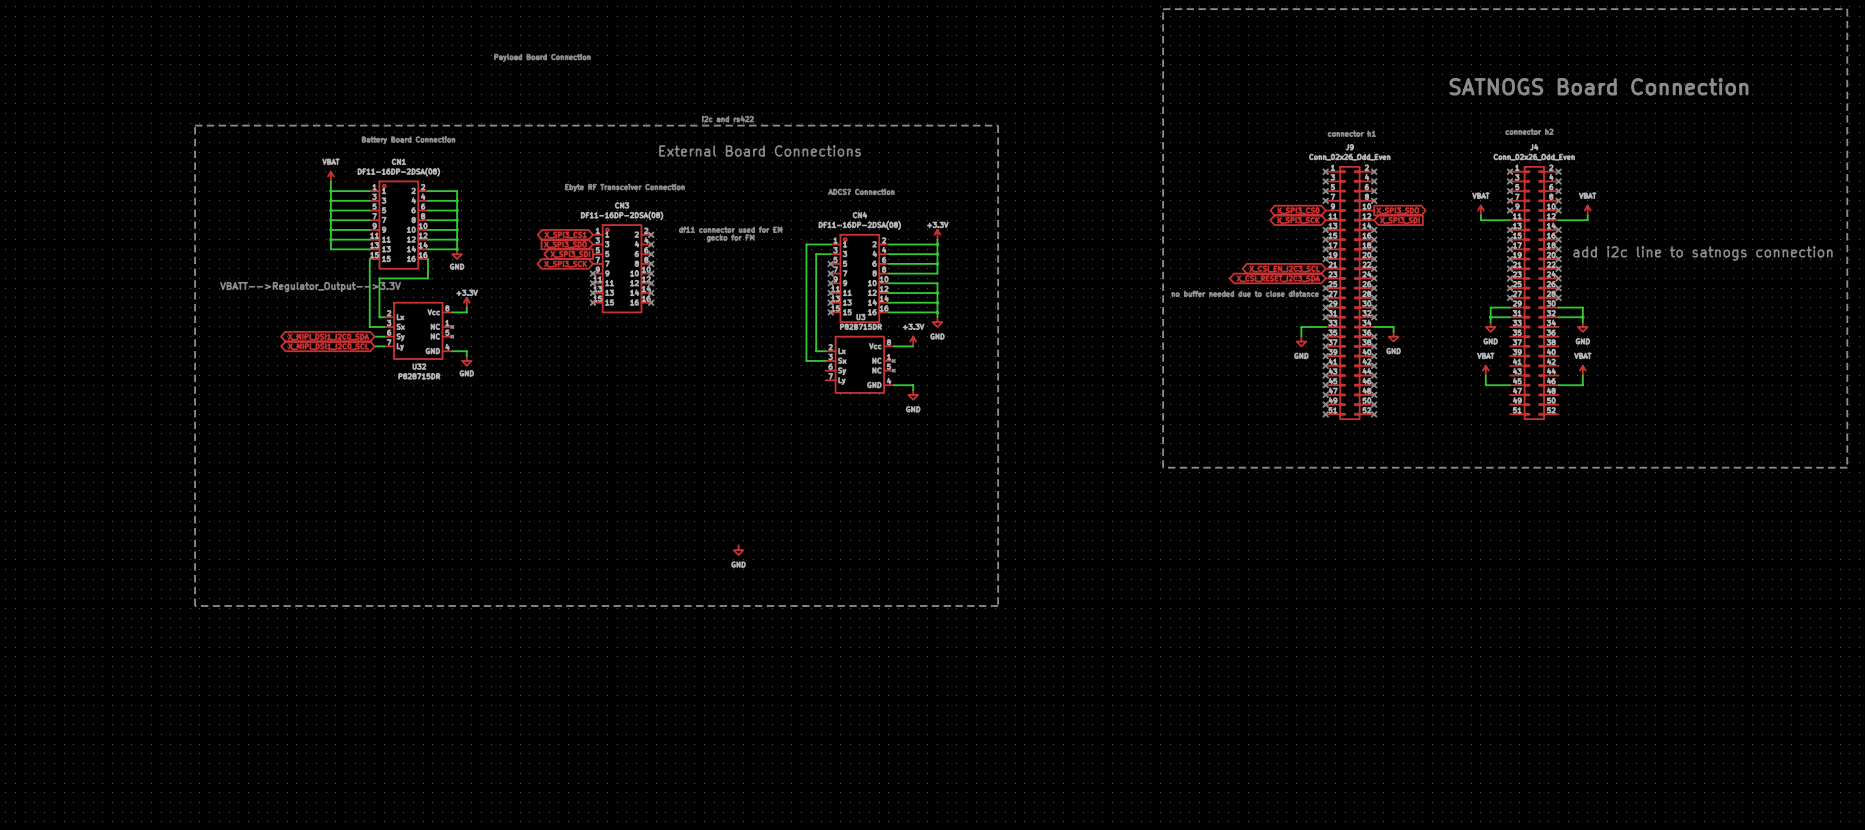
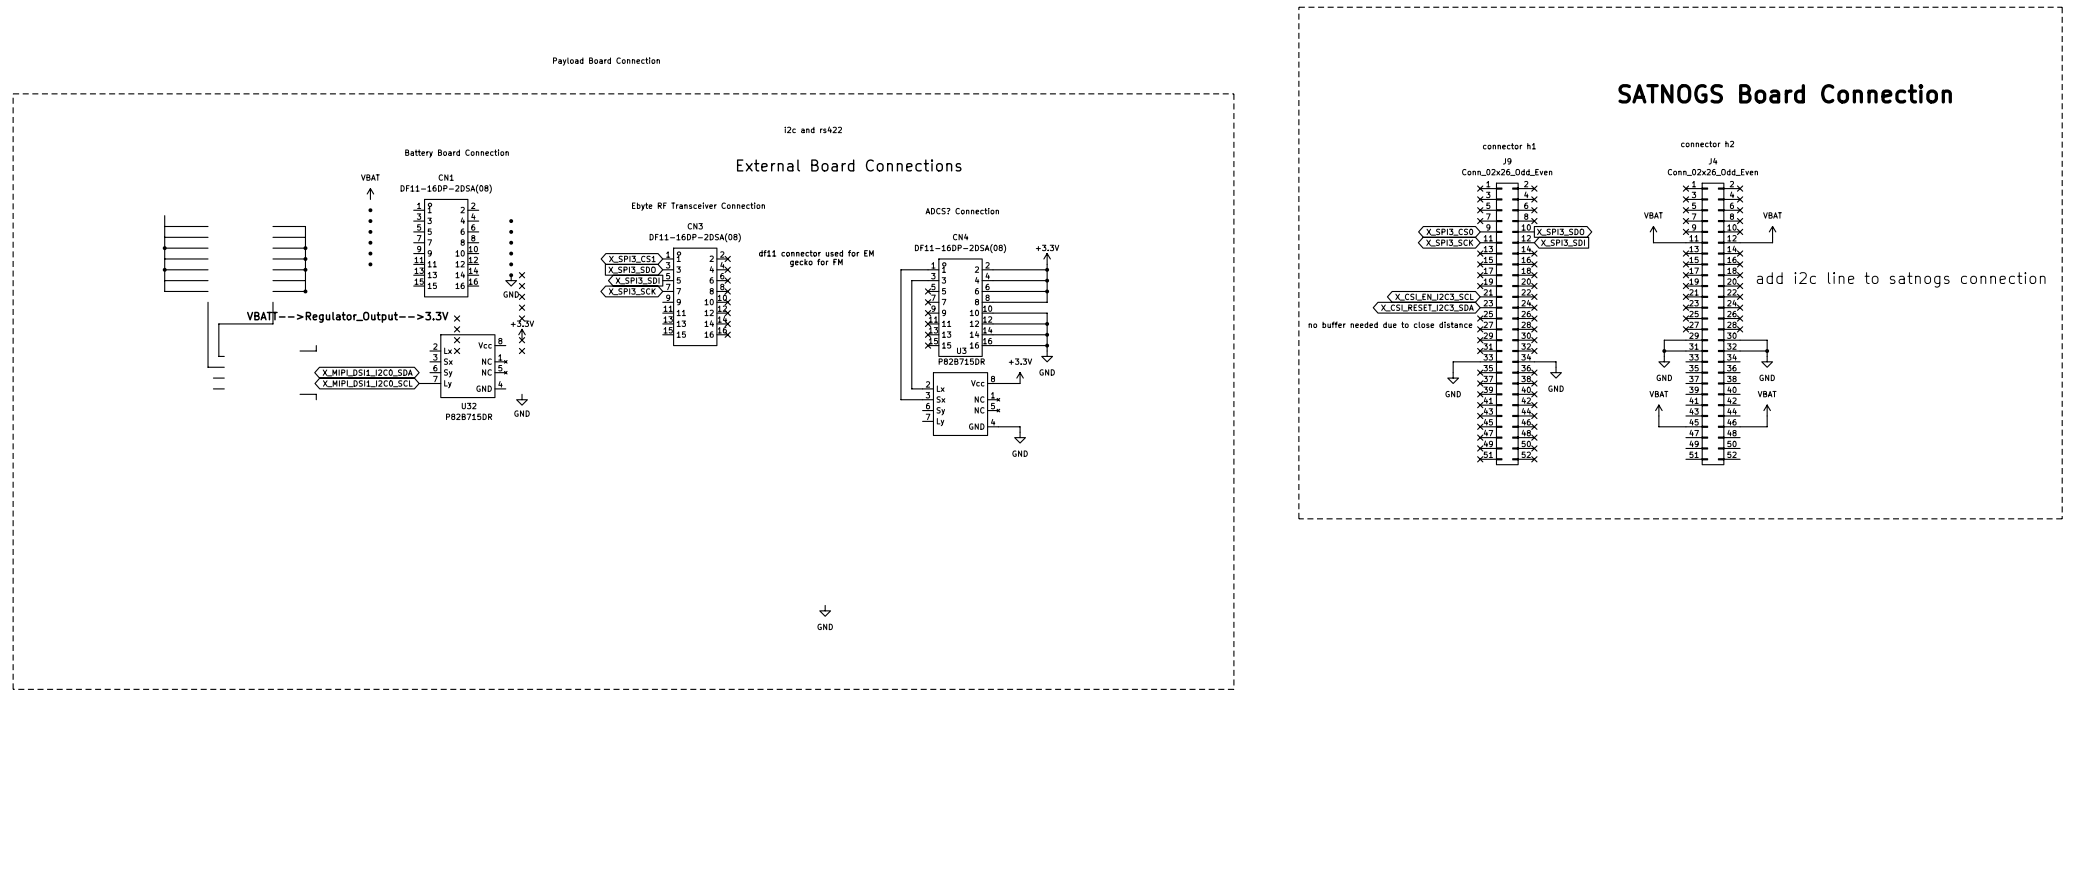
line: (195, 125) (998, 125) (998, 605) (195, 605) (195, 125) -> (13, 93) (13, 689) (1233, 689) (1233, 93) (13, 93)
wire: (330, 181) (330, 249) (369, 249) -> none
wire: (330, 191) (369, 191) -> none
wire: (427, 191) (457, 191) (457, 249) (427, 249) -> none
wire: none -> (164, 215) (164, 291) (208, 291)
wire: (330, 200) (369, 200) -> none
wire: (427, 200) (457, 200) -> none
wire: none -> (164, 226) (208, 226)
wire: none -> (272, 226) (305, 226) (305, 291) (272, 291)
wire: (330, 210) (369, 210) -> none
wire: (427, 210) (457, 210) -> none
wire: none -> (164, 237) (208, 237)
wire: none -> (272, 237) (305, 237)
wire: (330, 220) (369, 220) -> none
wire: (427, 220) (457, 220) -> none
wire: none -> (164, 248) (208, 248)
junction: none -> (164, 248)
wire: none -> (272, 248) (305, 248)
junction: none -> (305, 248)
wire: (330, 229) (369, 229) -> none
wire: (427, 229) (457, 229) -> none
wire: none -> (164, 258) (208, 258)
wire: none -> (272, 258) (305, 258)
junction: none -> (305, 258)
wire: (330, 239) (369, 239) -> none
wire: (427, 239) (457, 239) -> none
wire: none -> (164, 269) (208, 269)
junction: none -> (164, 269)
wire: none -> (272, 269) (305, 269)
junction: none -> (305, 269)
no-connect mark: none -> (522, 275)
wire: none -> (164, 280) (208, 280)
wire: none -> (272, 280) (305, 280)
wire: (369, 259) (369, 326) (384, 326) -> none
wire: (427, 259) (427, 278) (379, 278) (379, 317) (384, 317) -> none
no-connect mark: none -> (522, 286)
junction: none -> (305, 291)
no-connect mark: none -> (522, 296)
wire: none -> (208, 302) (208, 367) (224, 367)
wire: none -> (272, 302) (272, 323) (218, 323) (218, 356) (224, 356)
no-connect mark: (592, 273) -> none
no-connect mark: none -> (522, 307)
no-connect mark: (592, 283) -> none
no-connect mark: none -> (457, 318)
no-connect mark: none -> (522, 318)
no-connect mark: (592, 293) -> none
no-connect mark: none -> (457, 329)
no-connect mark: (592, 302) -> none
no-connect mark: none -> (457, 340)
wire: (466, 307) (466, 312) (452, 312) -> none
no-connect mark: none -> (522, 340)
wire: none -> (316, 345) (316, 351) (300, 351)
no-connect mark: none -> (457, 351)
no-connect mark: none -> (522, 351)
wire: (374, 336) (384, 336) -> none
wire: none -> (213, 378) (224, 378)
wire: none -> (213, 388) (224, 388)
wire: (452, 351) (466, 351) (466, 356) -> none
wire: none -> (300, 394) (316, 394) (316, 399)

